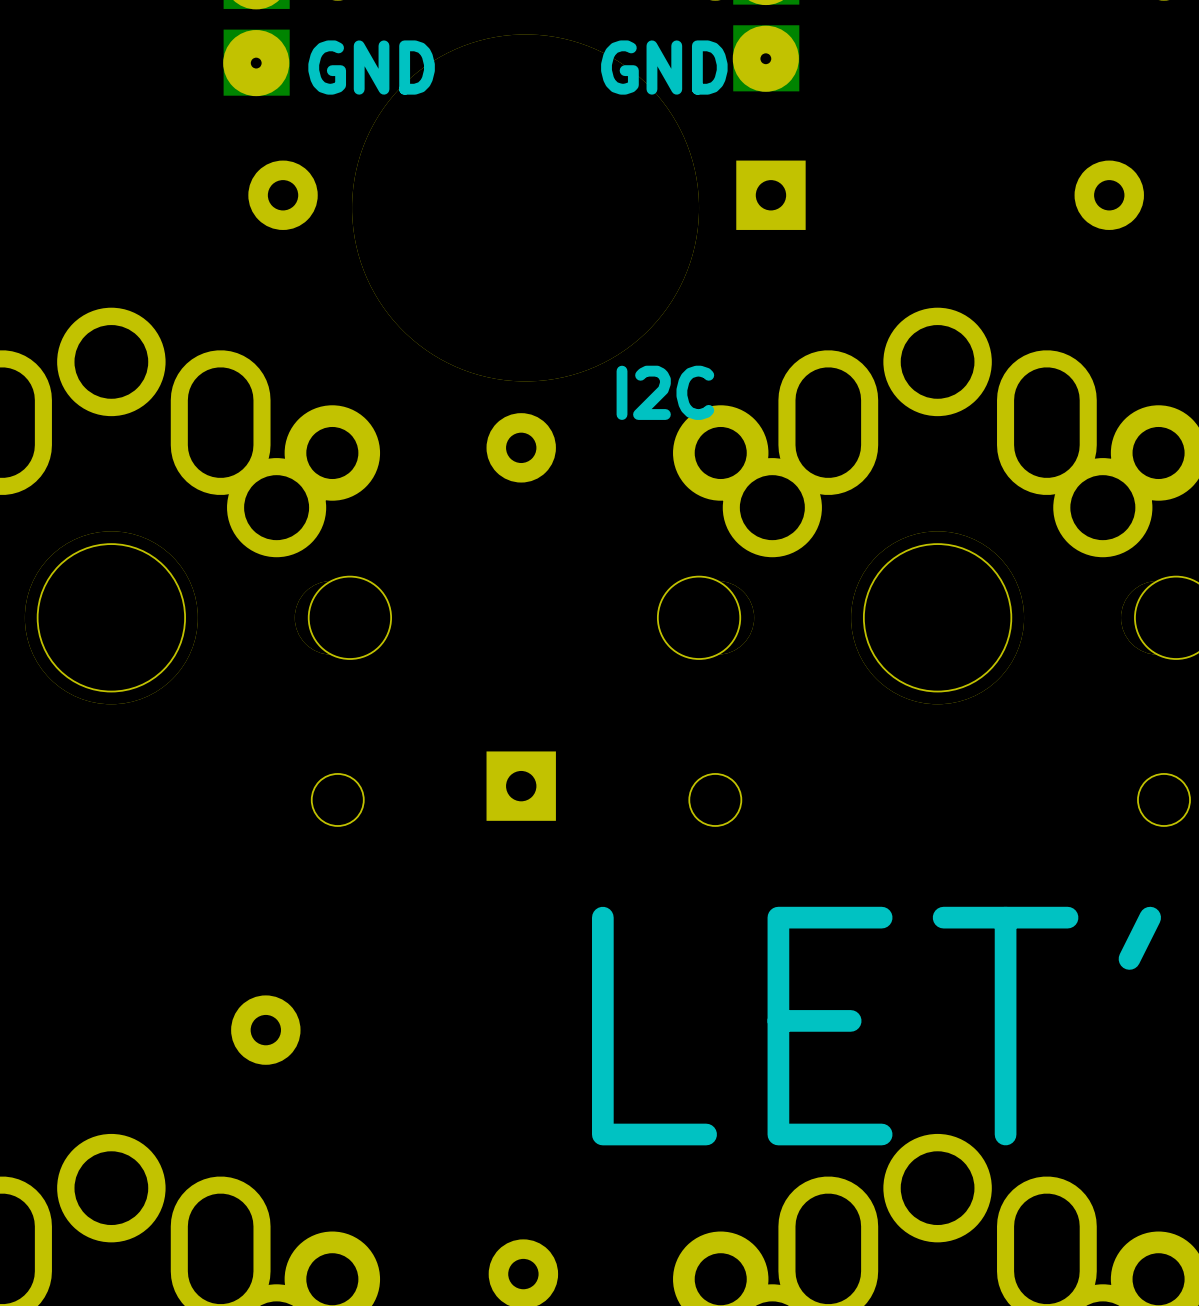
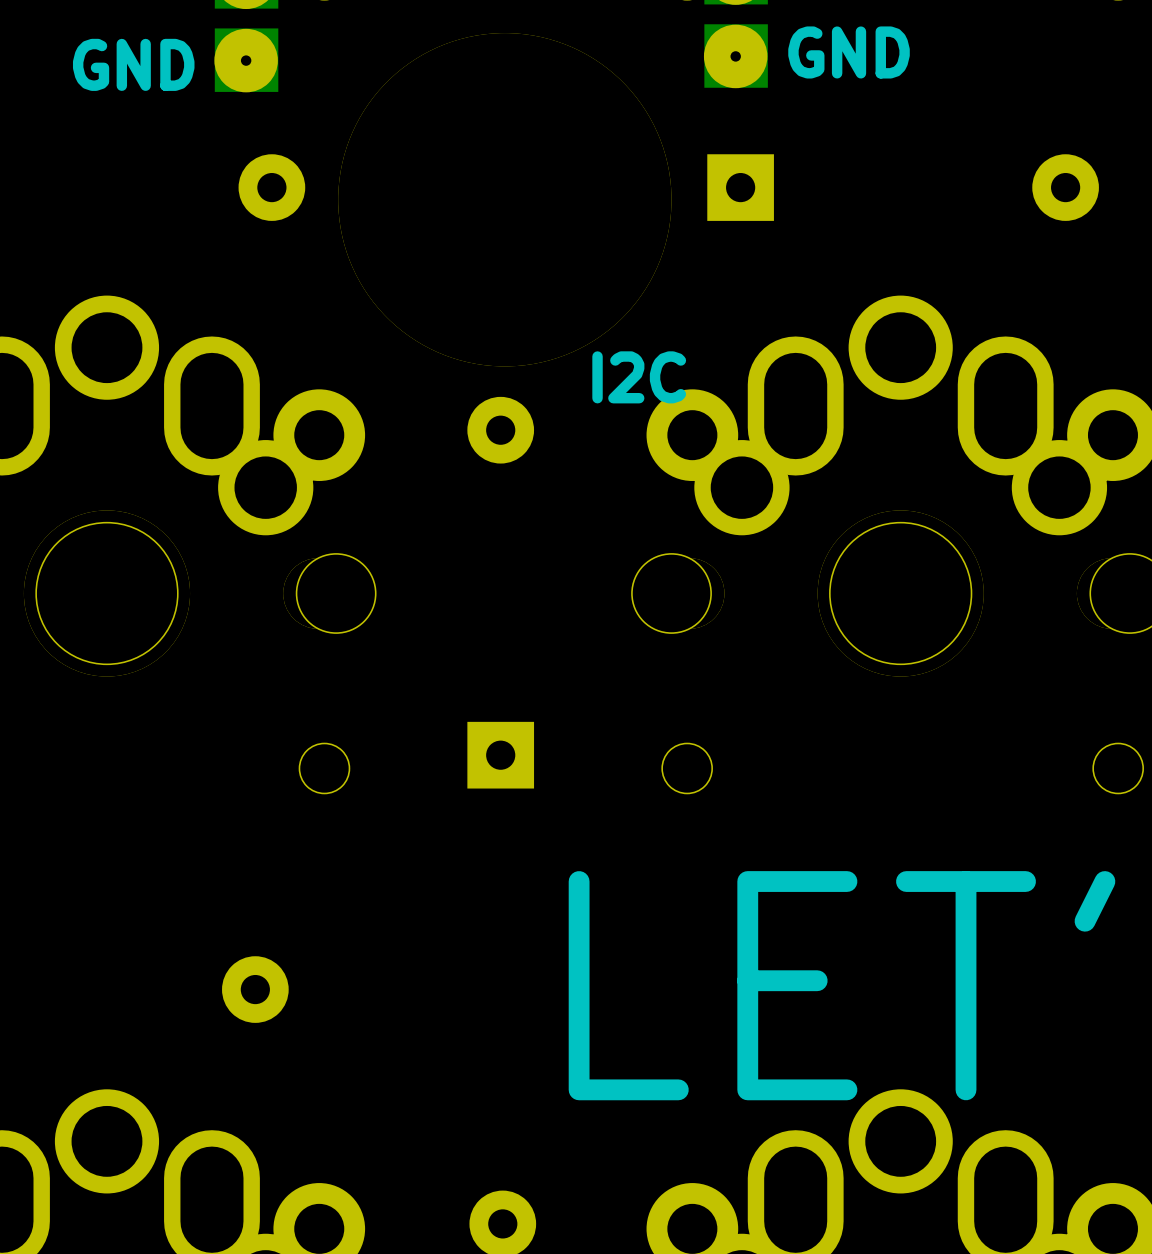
text position: GND (371, 67) -> GND (133, 64)
text position: GND (664, 67) -> GND (849, 52)

